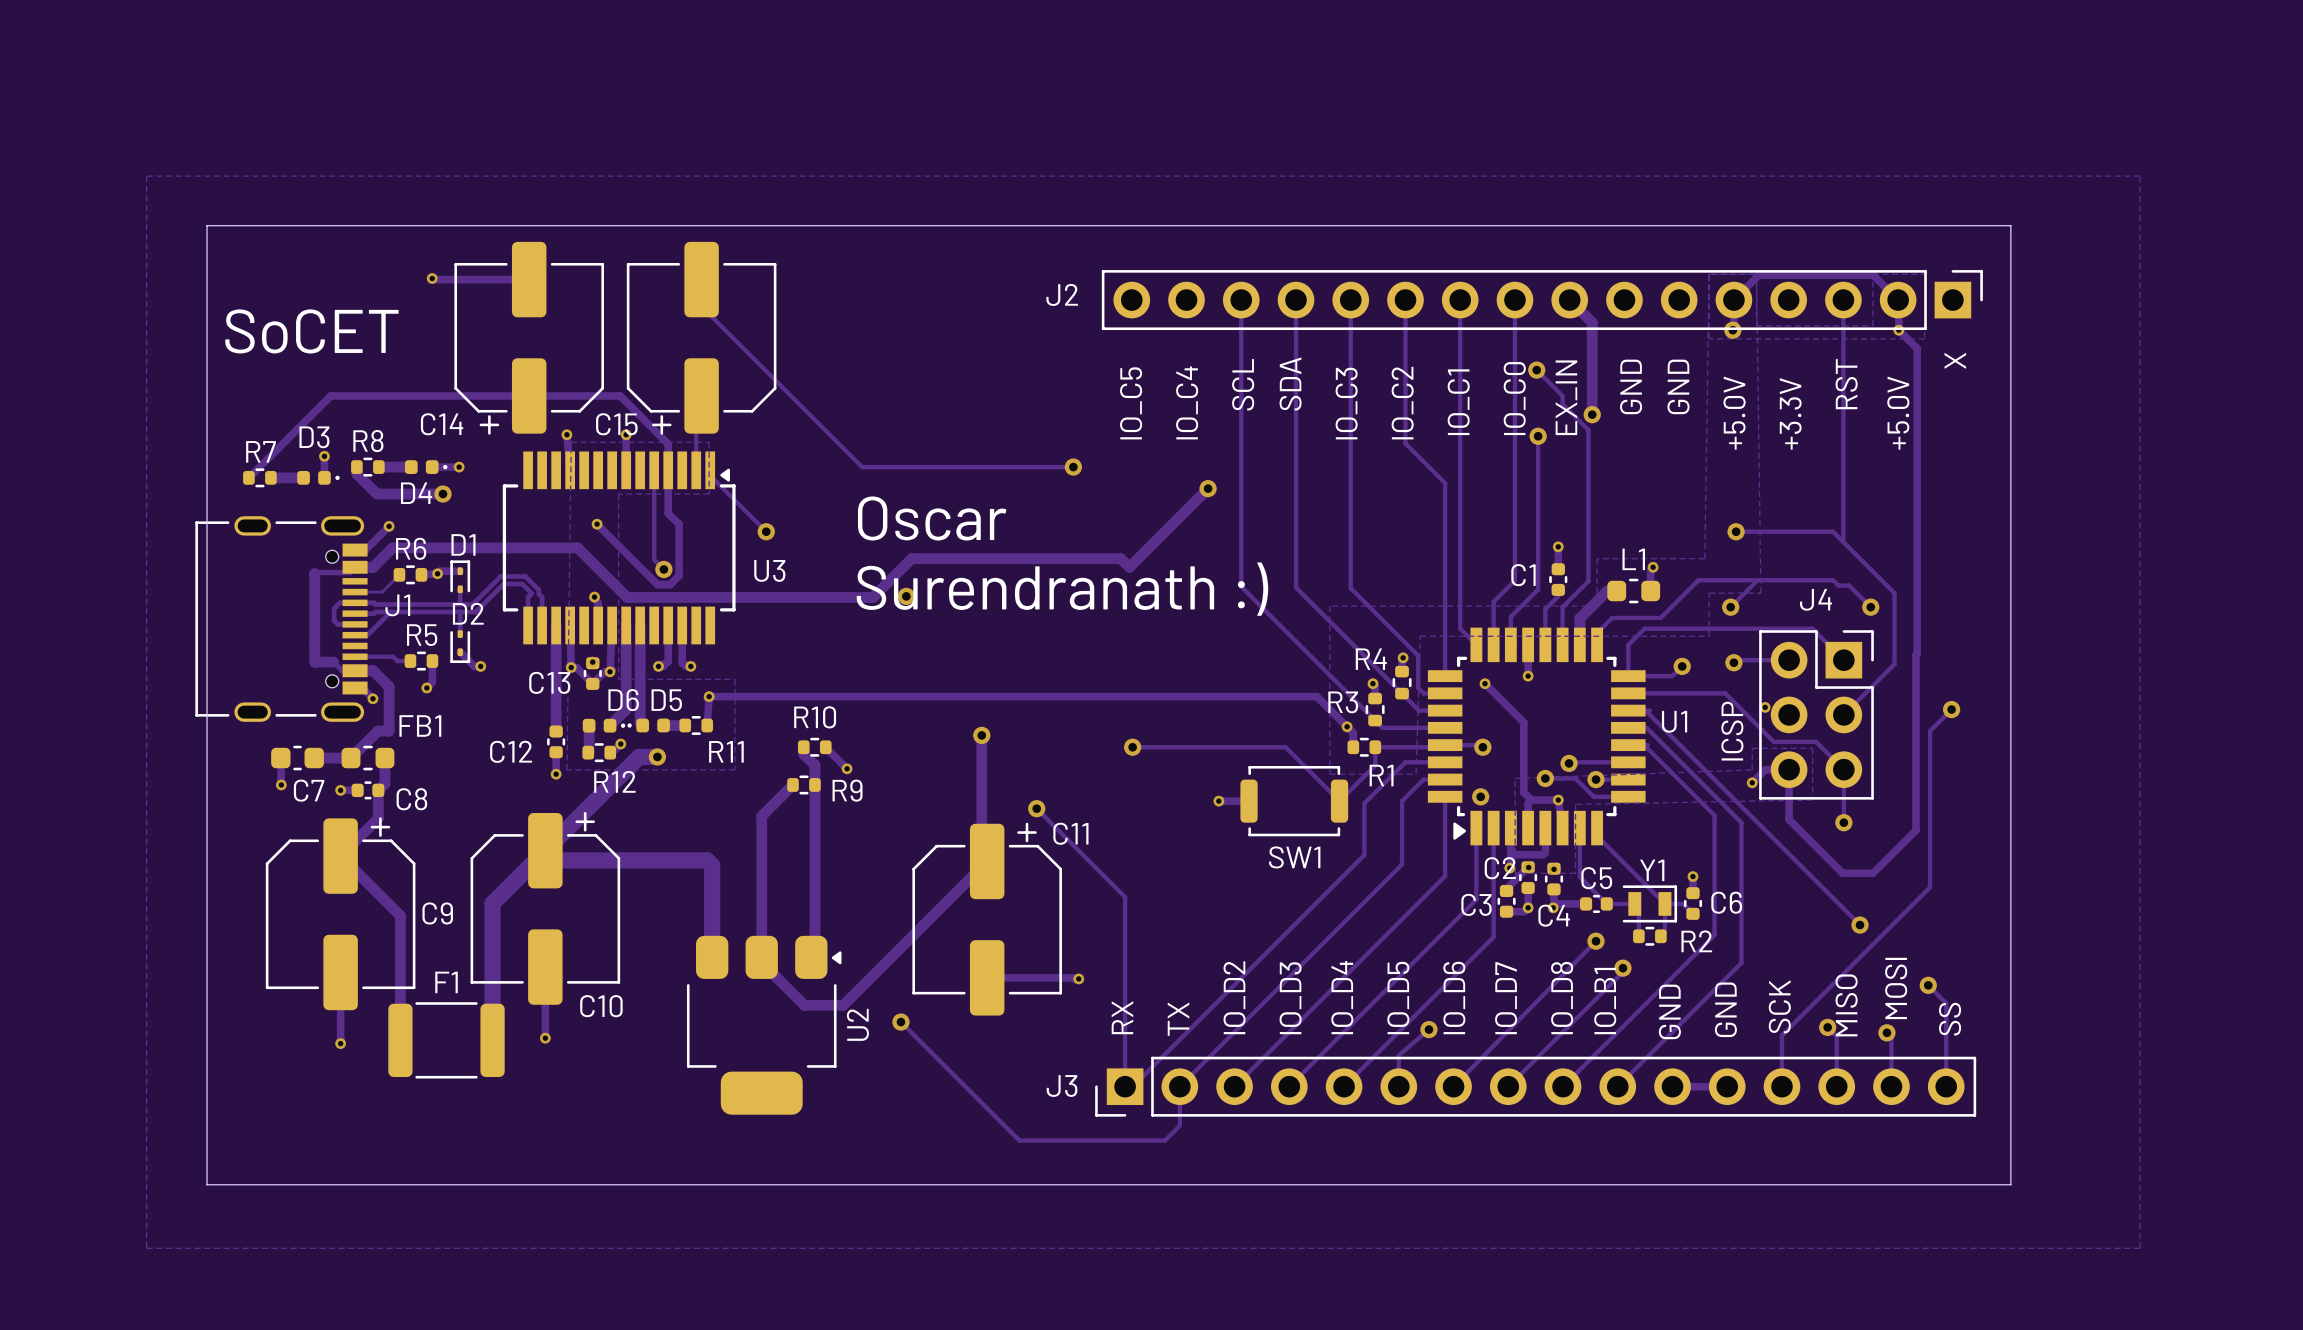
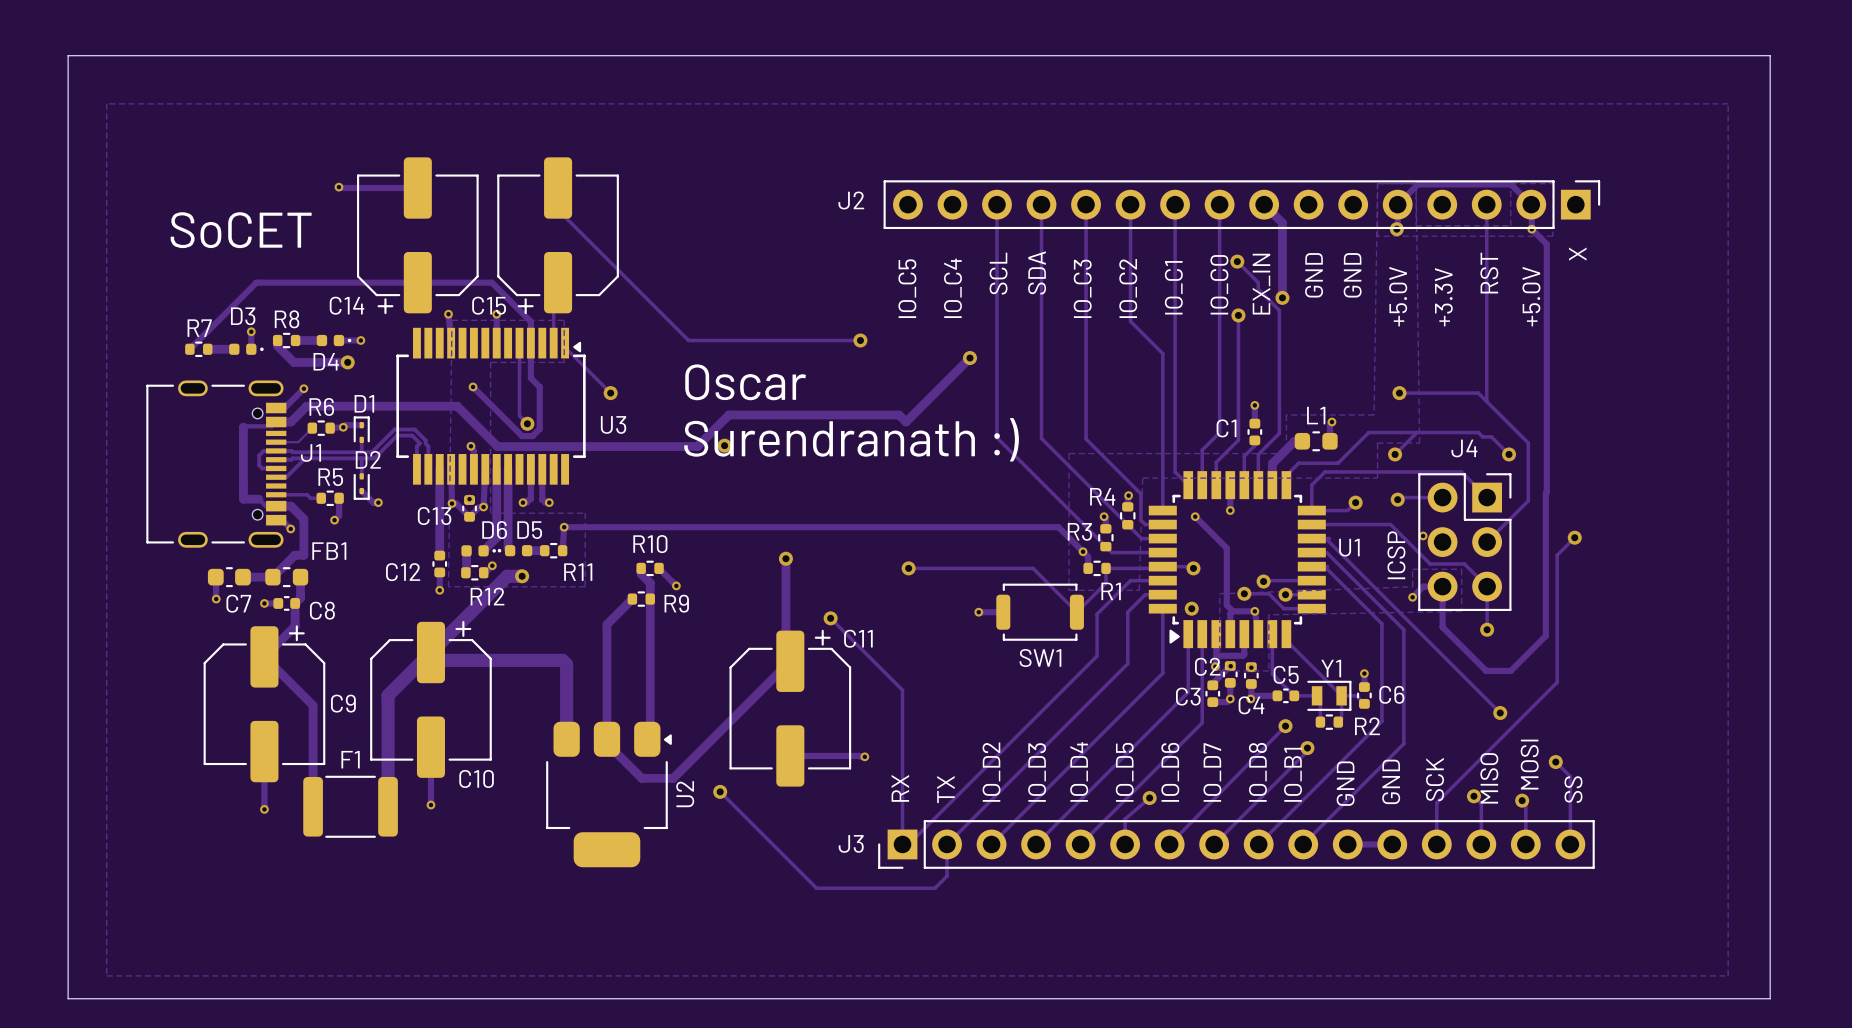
board edge: (207, 225) (2010, 225) (2010, 1184) (207, 1184) (207, 225) -> (68, 55) (68, 998) (1770, 998) (1770, 55) (68, 55)

